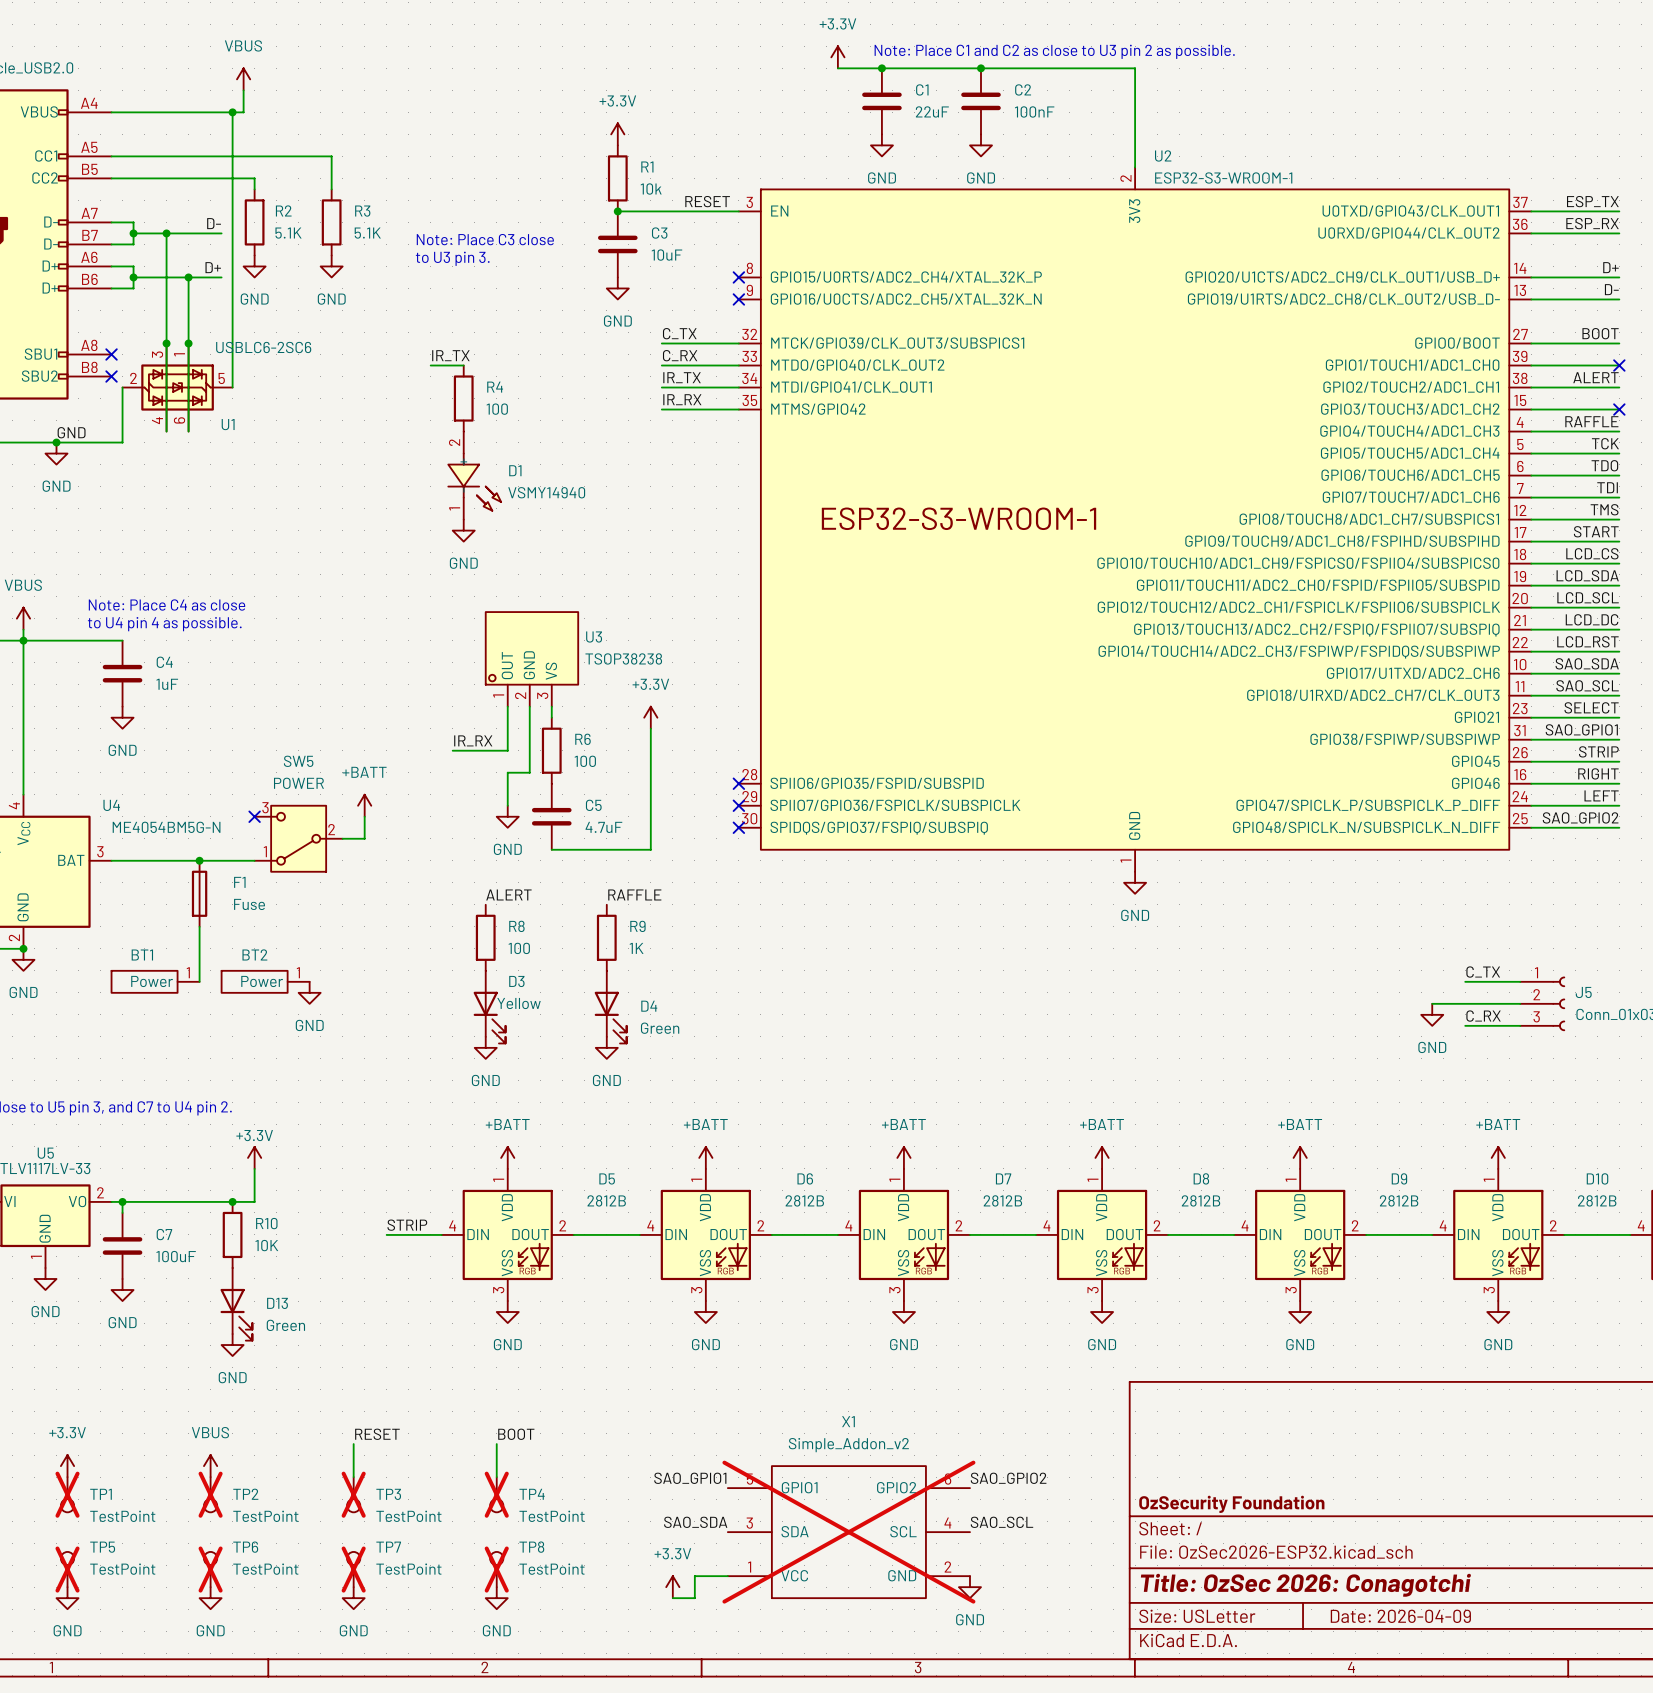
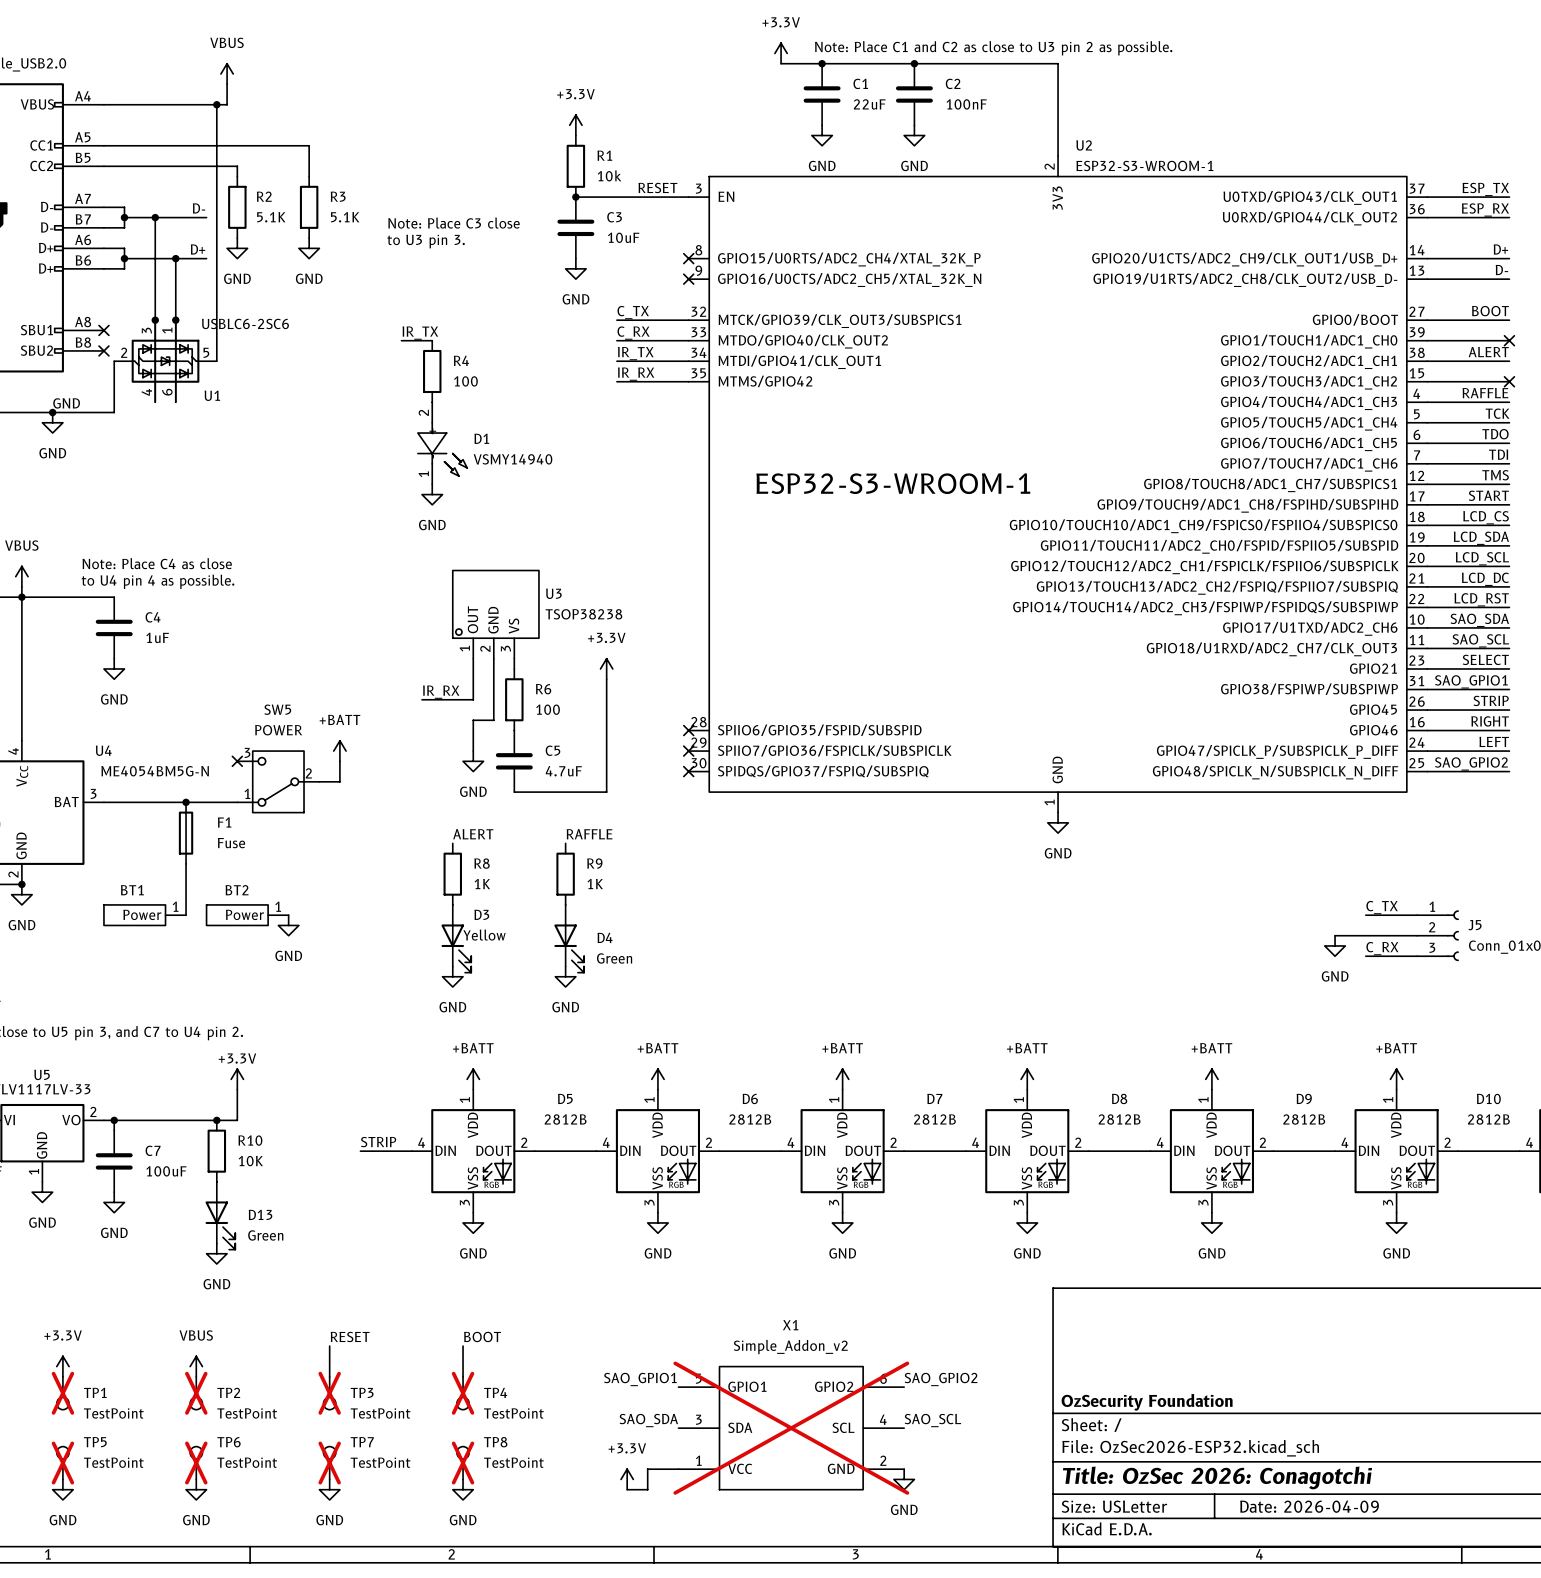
R8 value: 100 (519, 948) -> 1K (482, 884)

